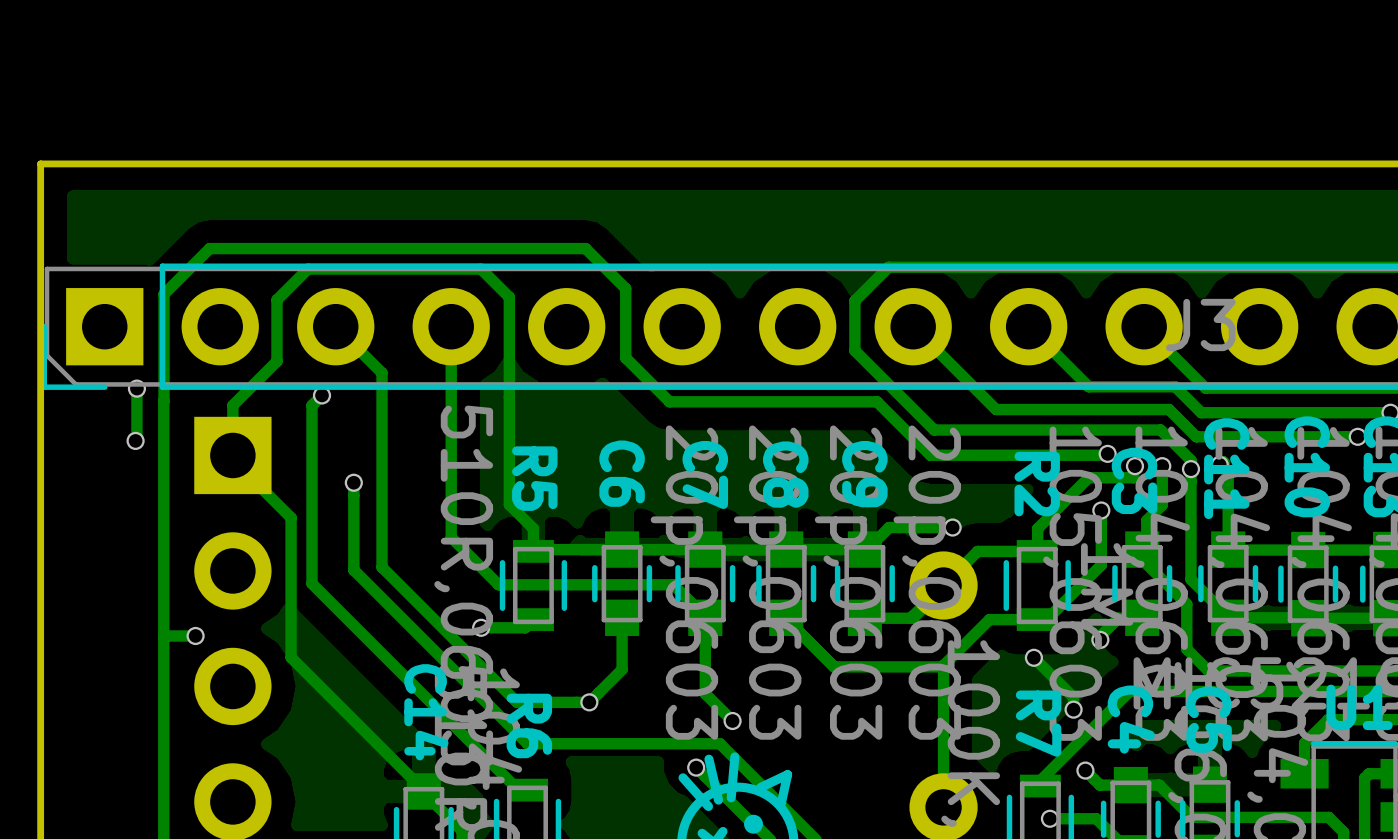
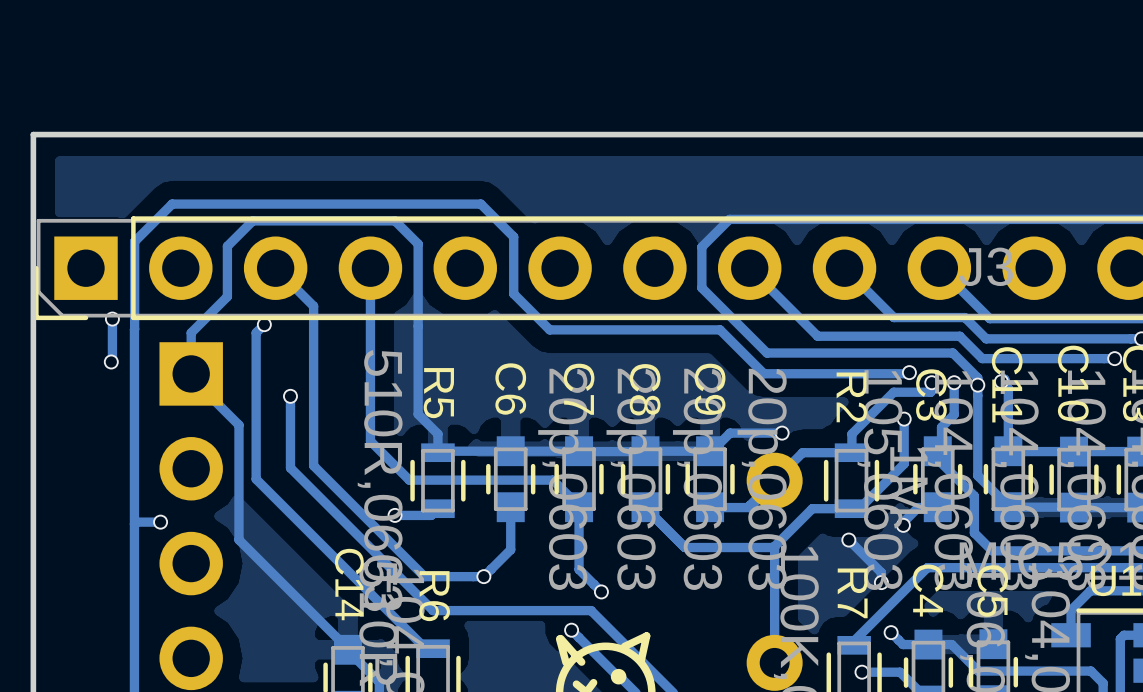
line: (734, 756) (731, 797) -> none
line: (708, 759) (718, 800) -> none
line: none -> (559, 638) (565, 662)

